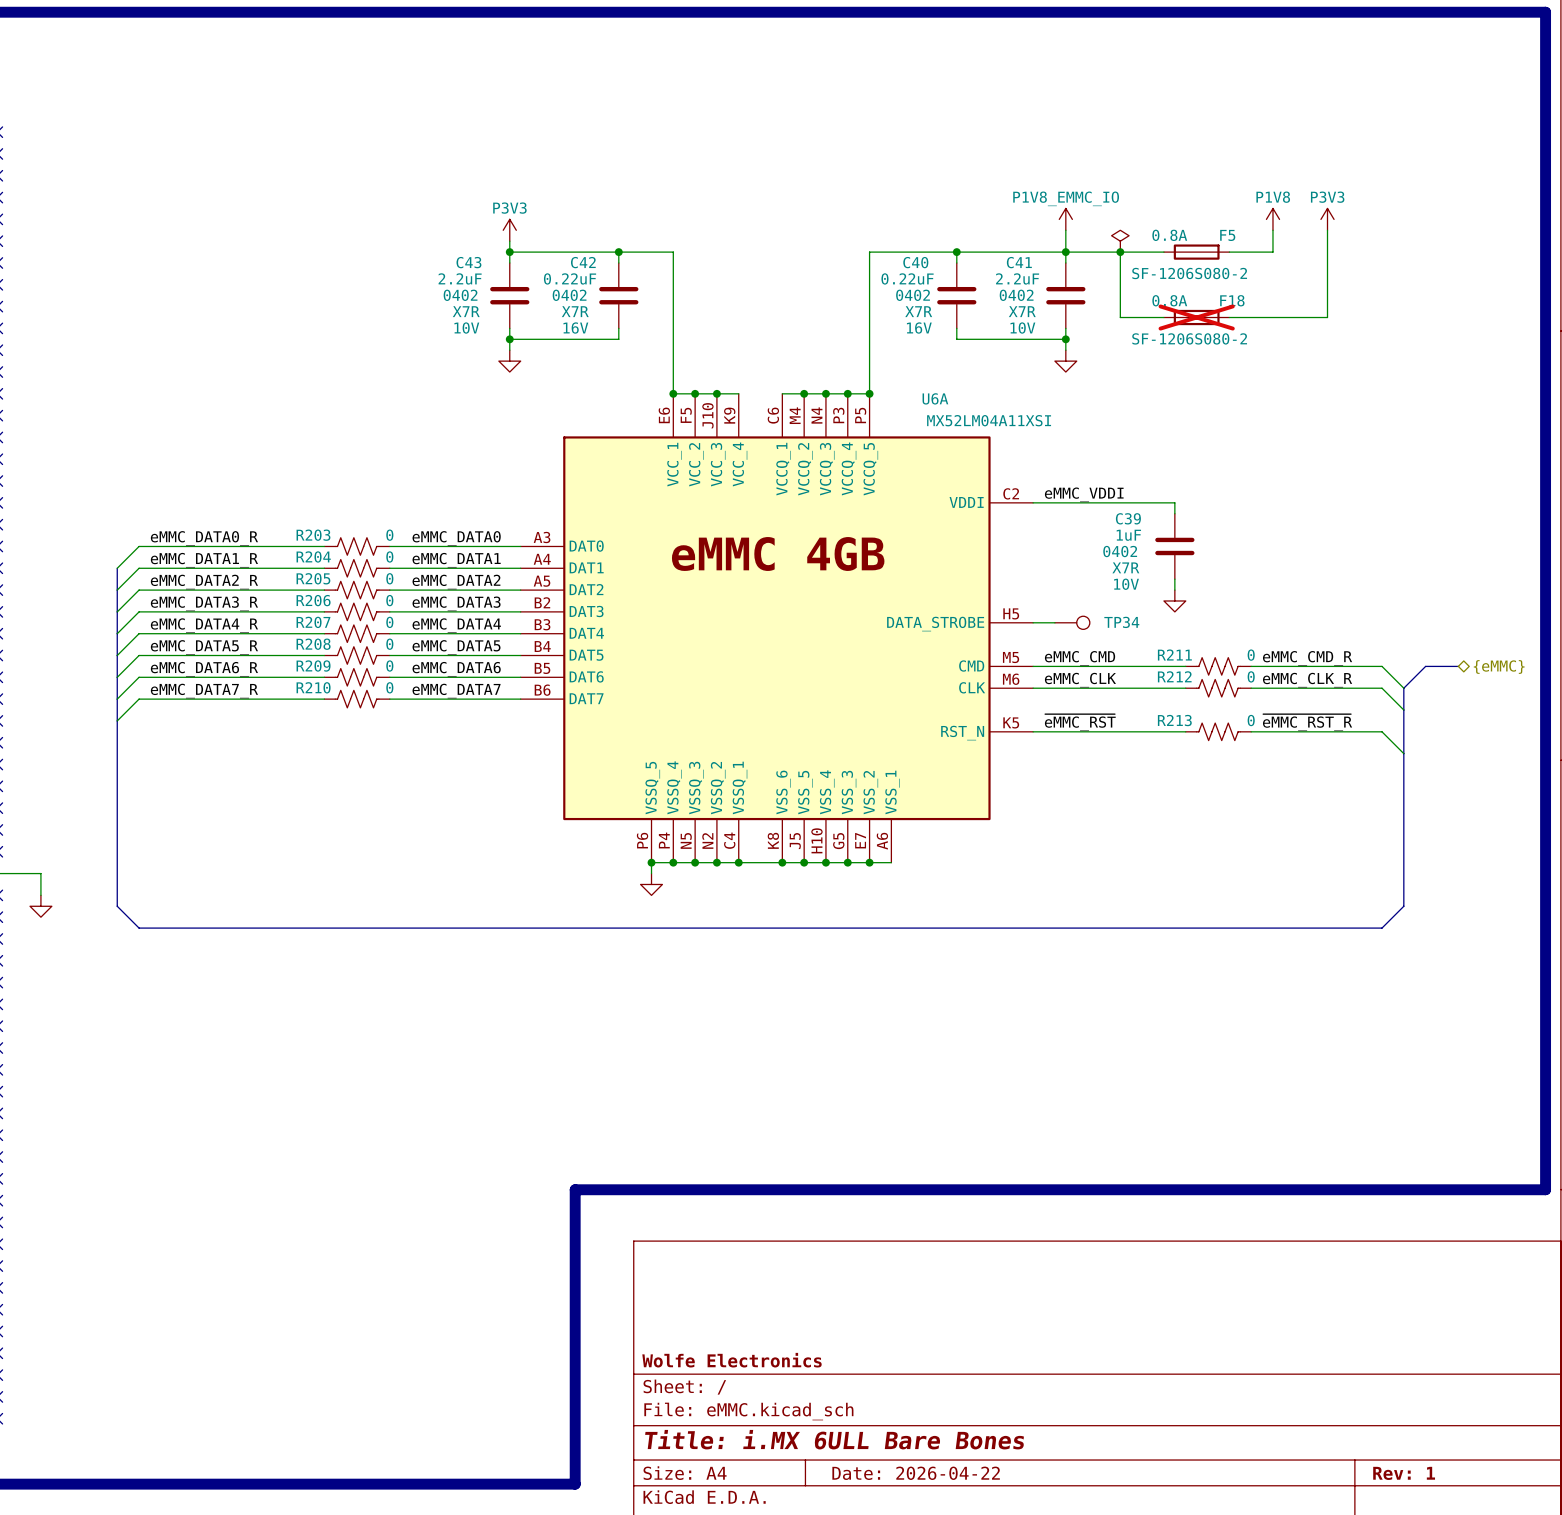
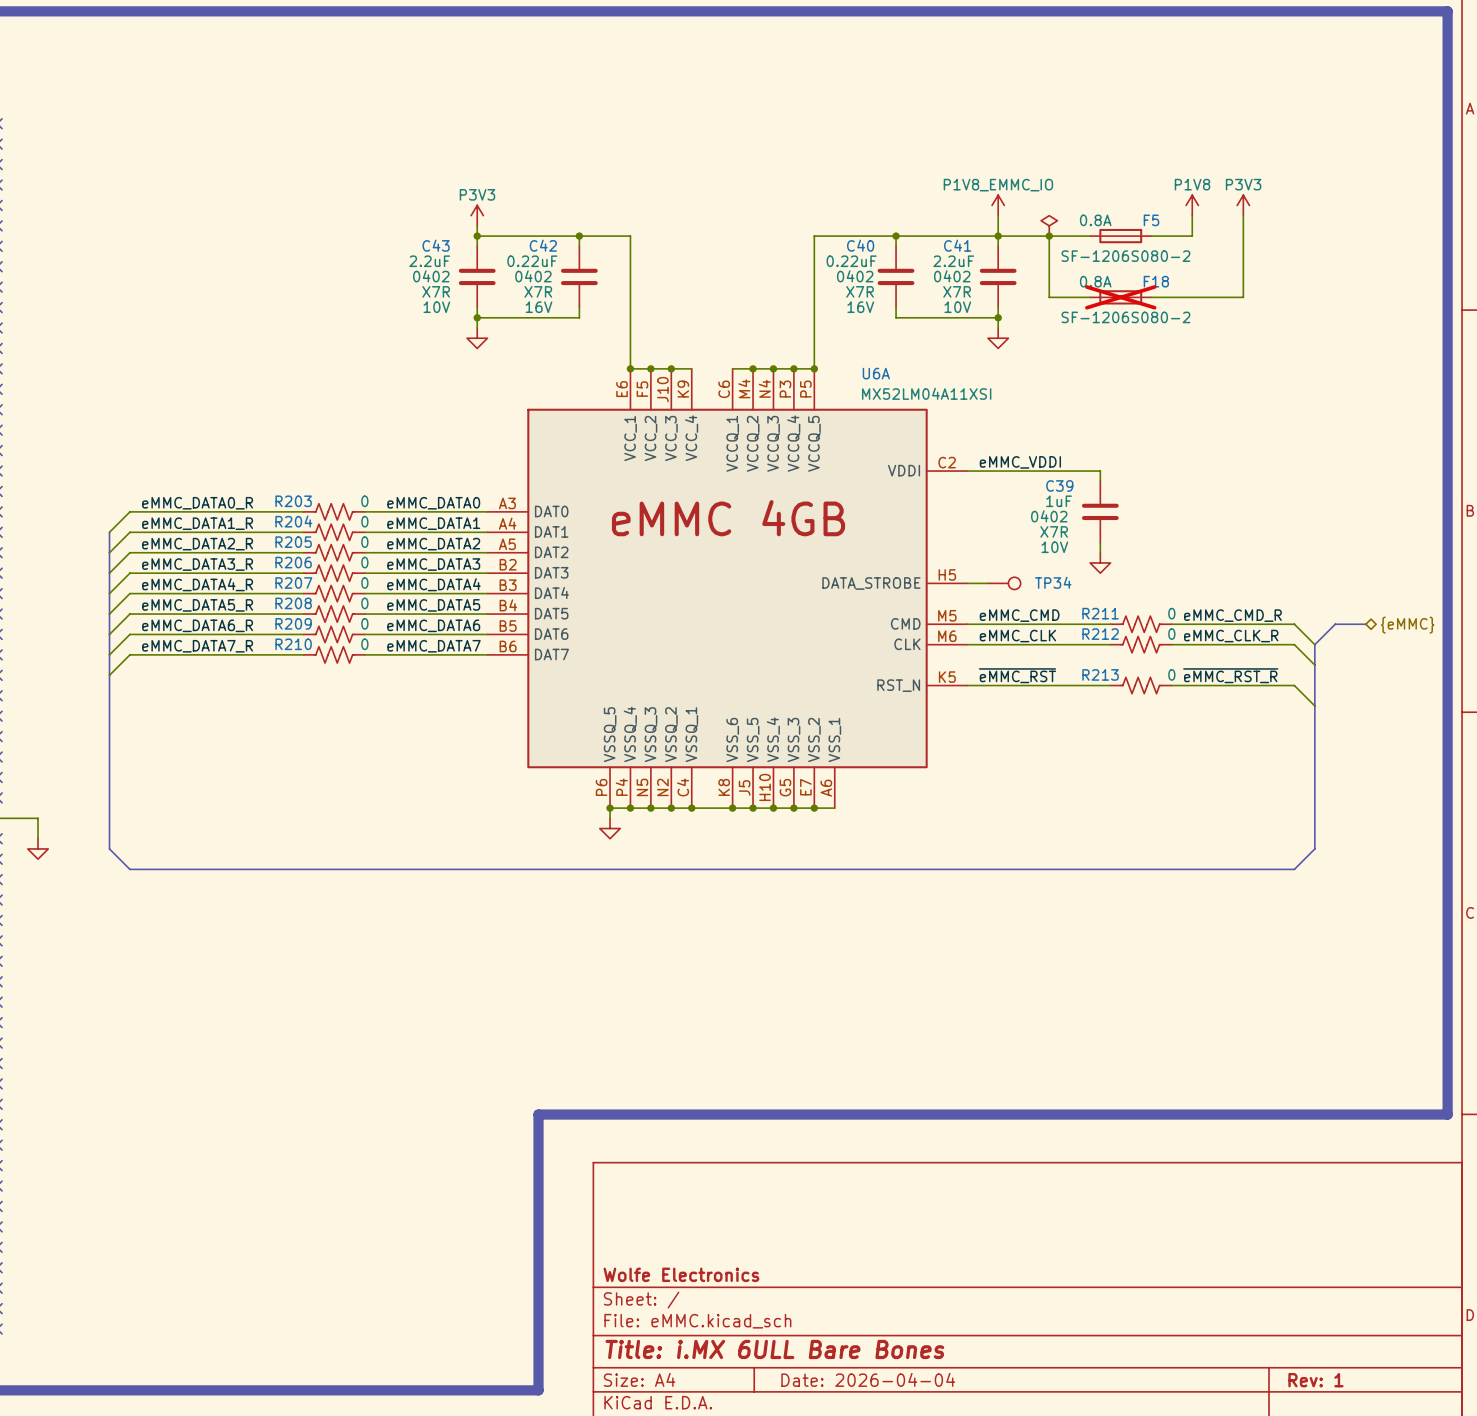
title block: Date: 2026-04-22 (916, 1473) -> Date: 2026-04-04 (868, 1379)

